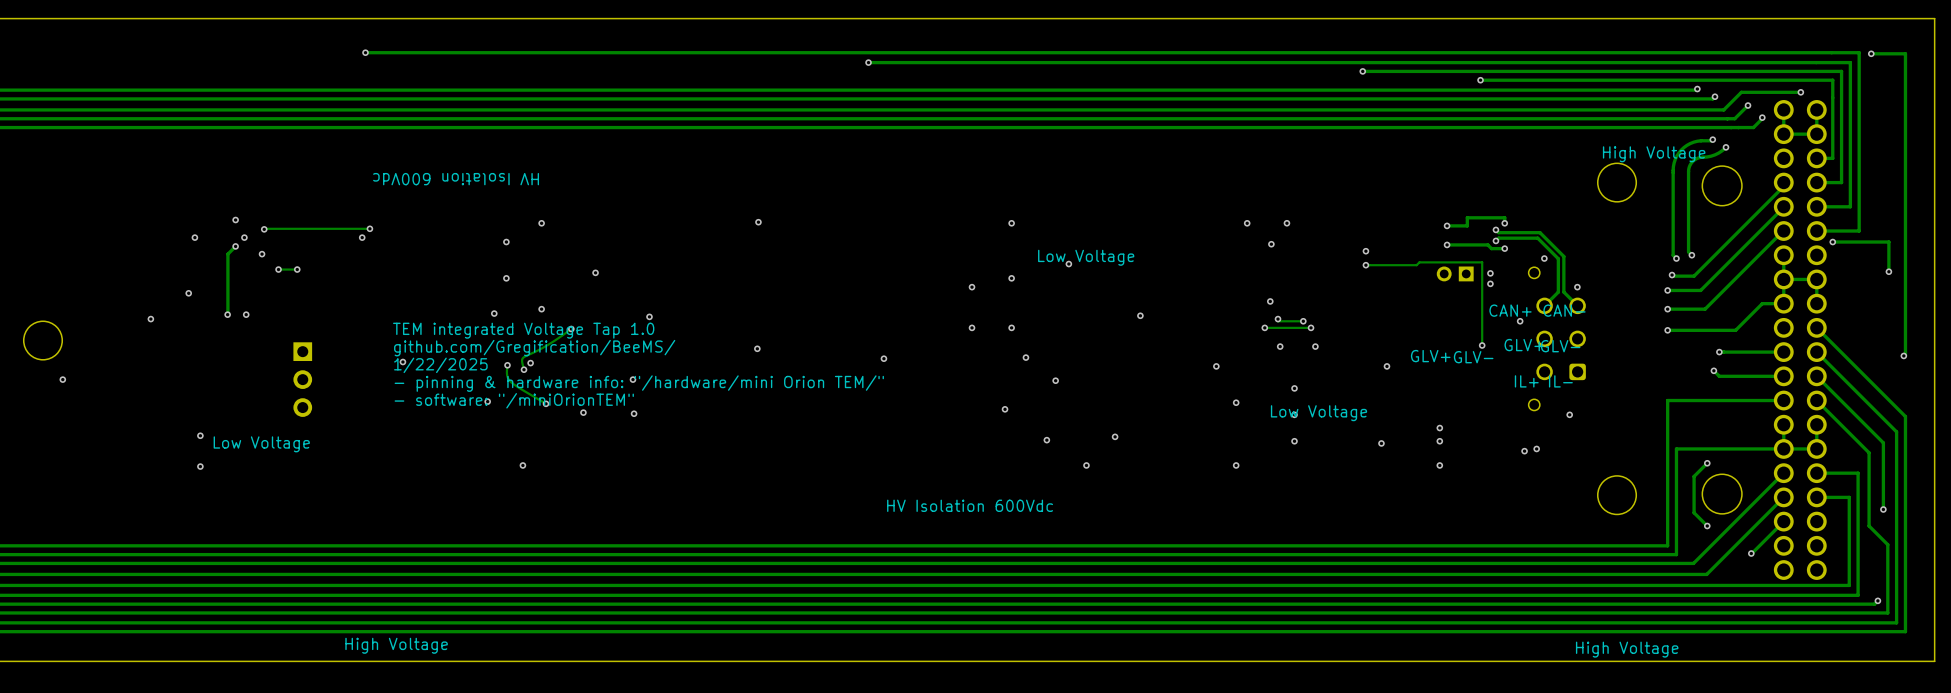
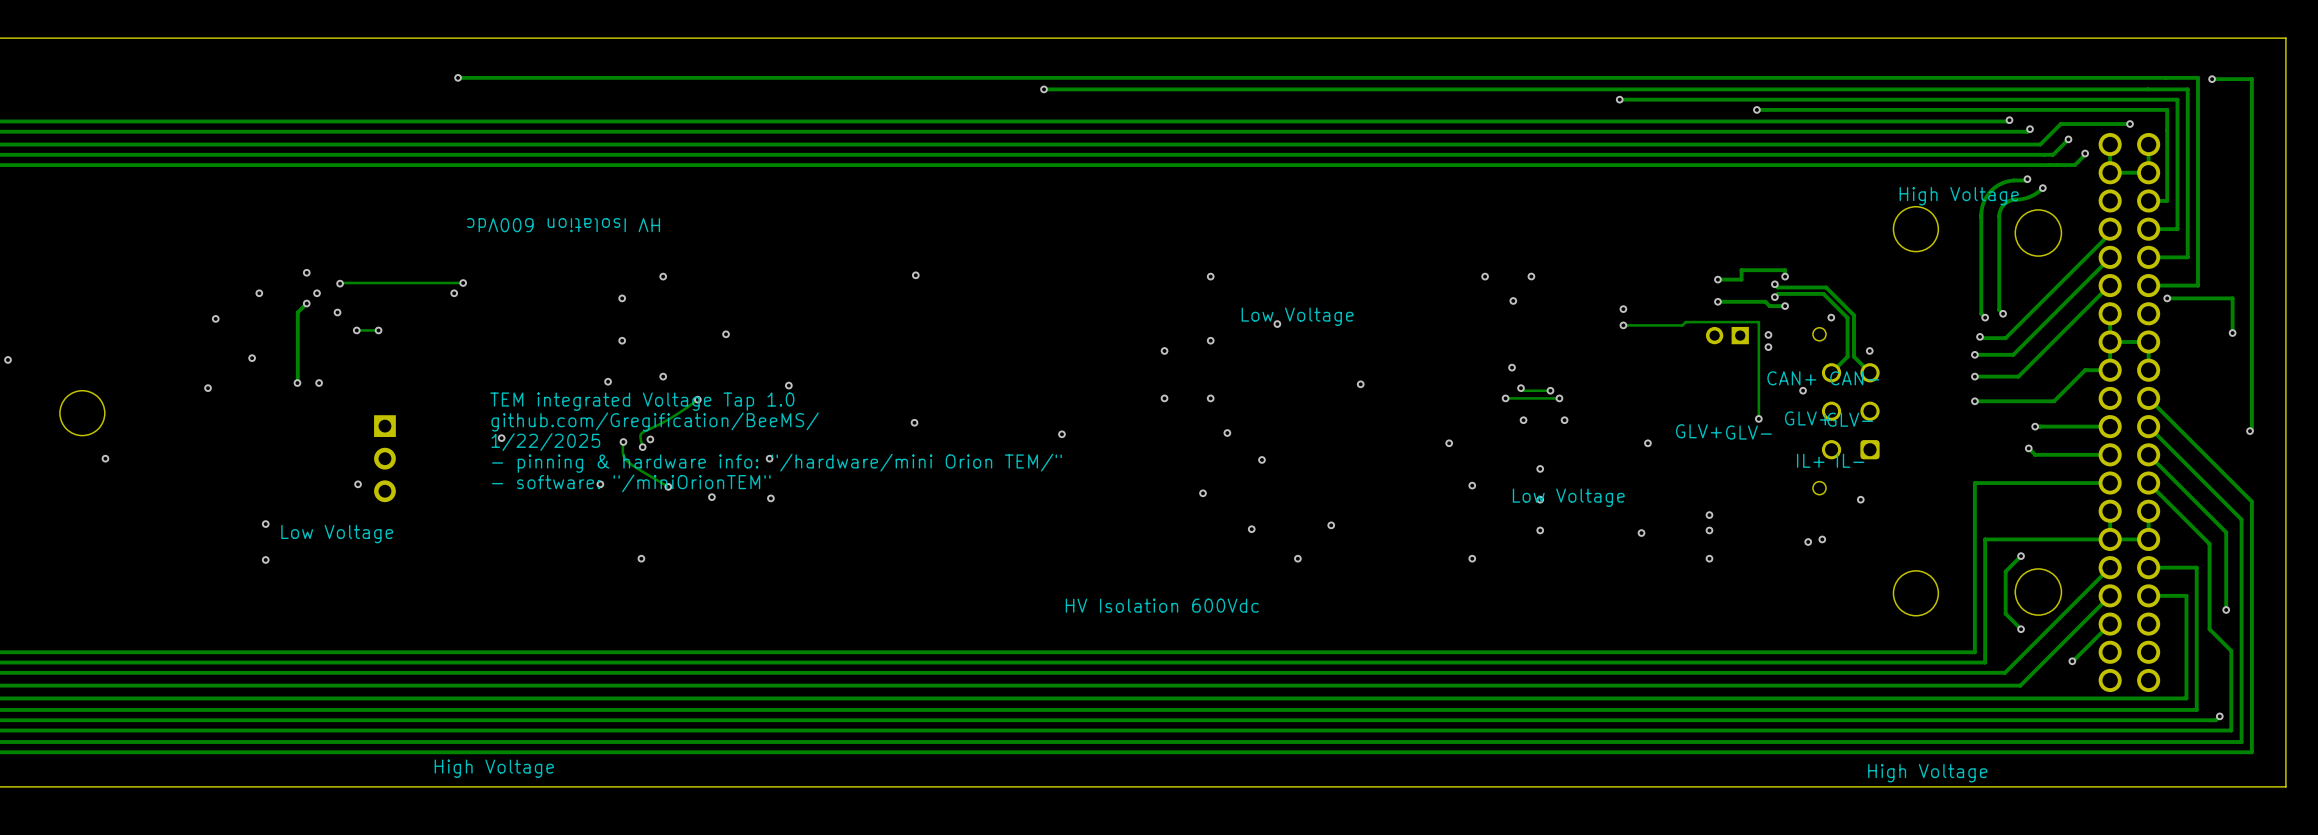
via: none -> (215, 318)
via: none -> (358, 484)

